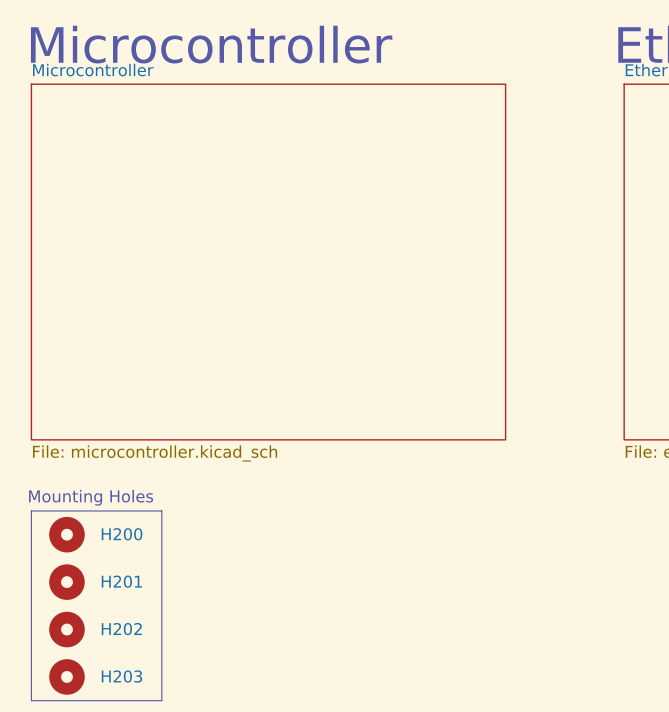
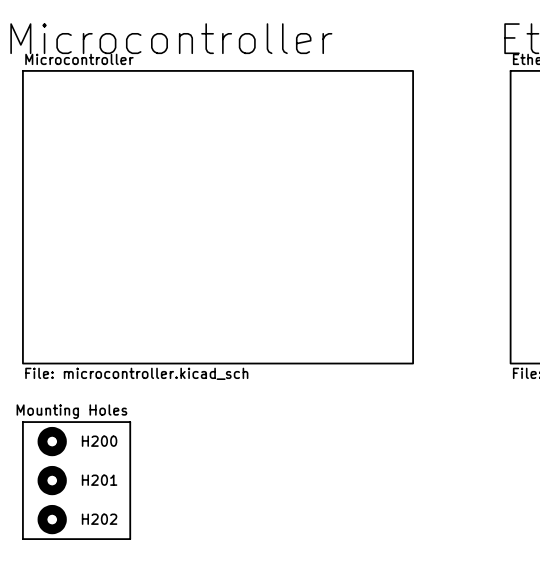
line: (31, 653) (31, 700) (161, 700) (161, 653) -> (22, 539) (130, 539)
H203: (66, 676) -> none

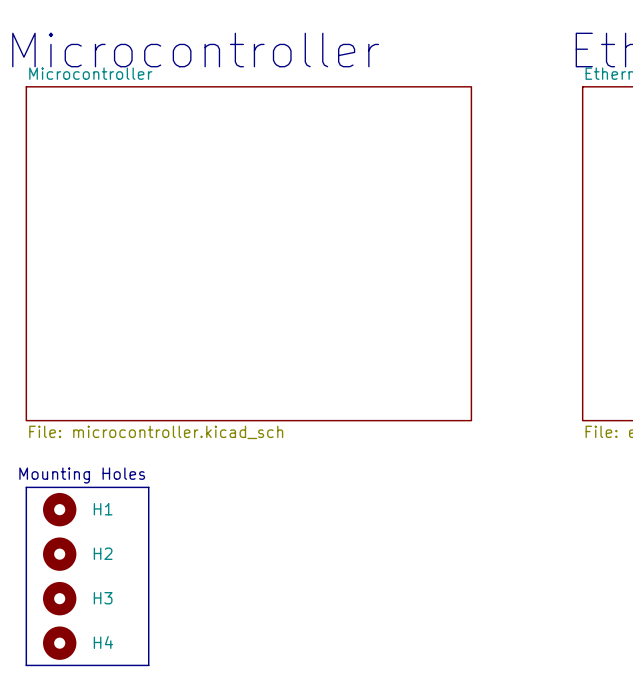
H200 name: H200 (99, 441) -> H1 (103, 509)
H201 name: H201 (99, 480) -> H2 (103, 553)
H202 name: H202 (99, 519) -> H3 (103, 598)
line: (22, 539) (130, 539) -> (26, 620) (26, 665) (148, 665) (148, 620)
H4: none -> (59, 643)

